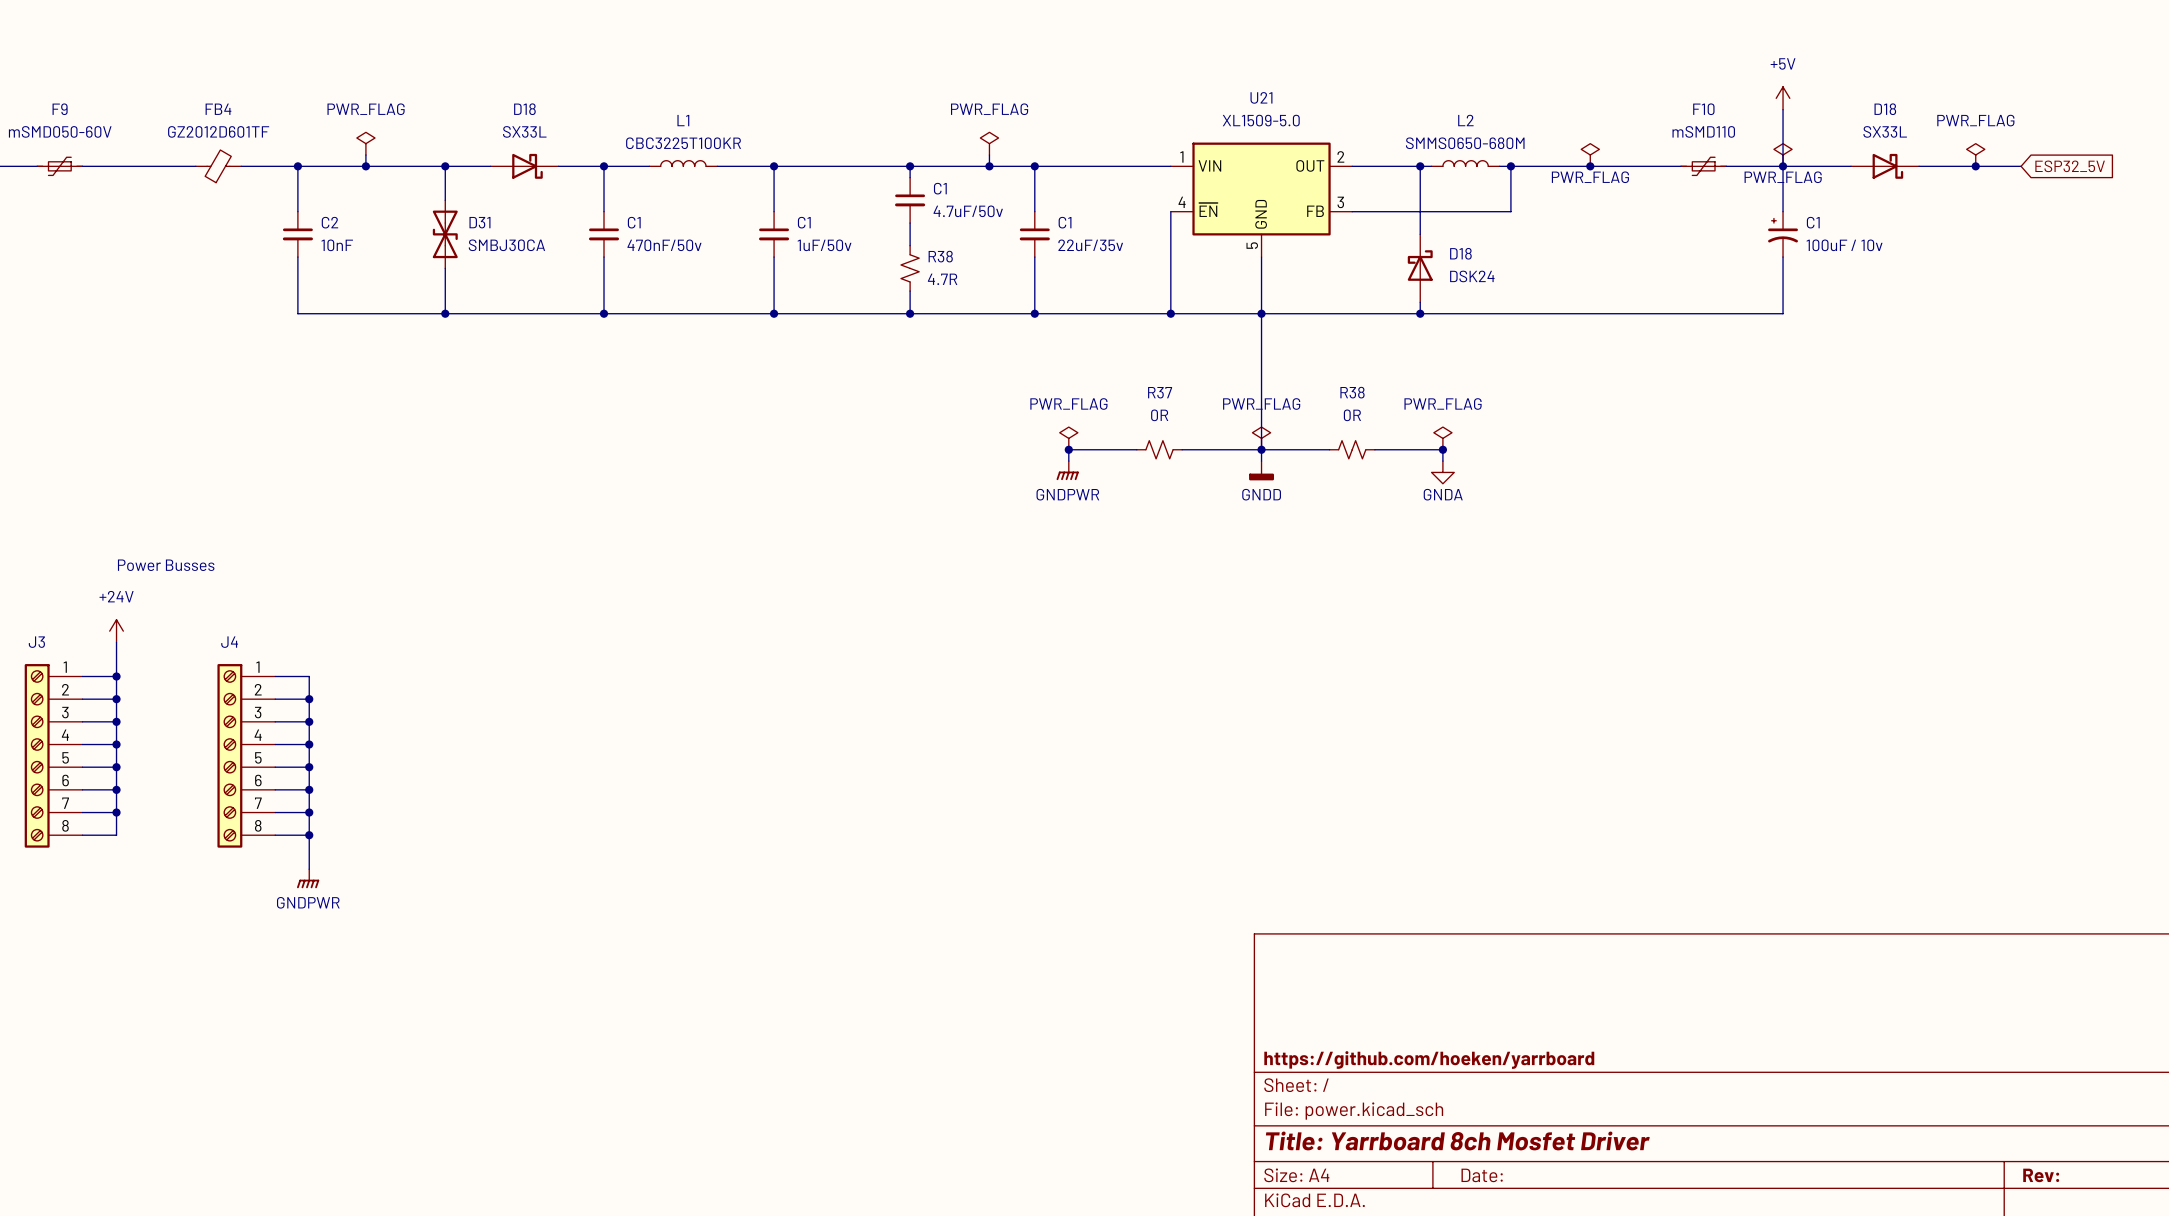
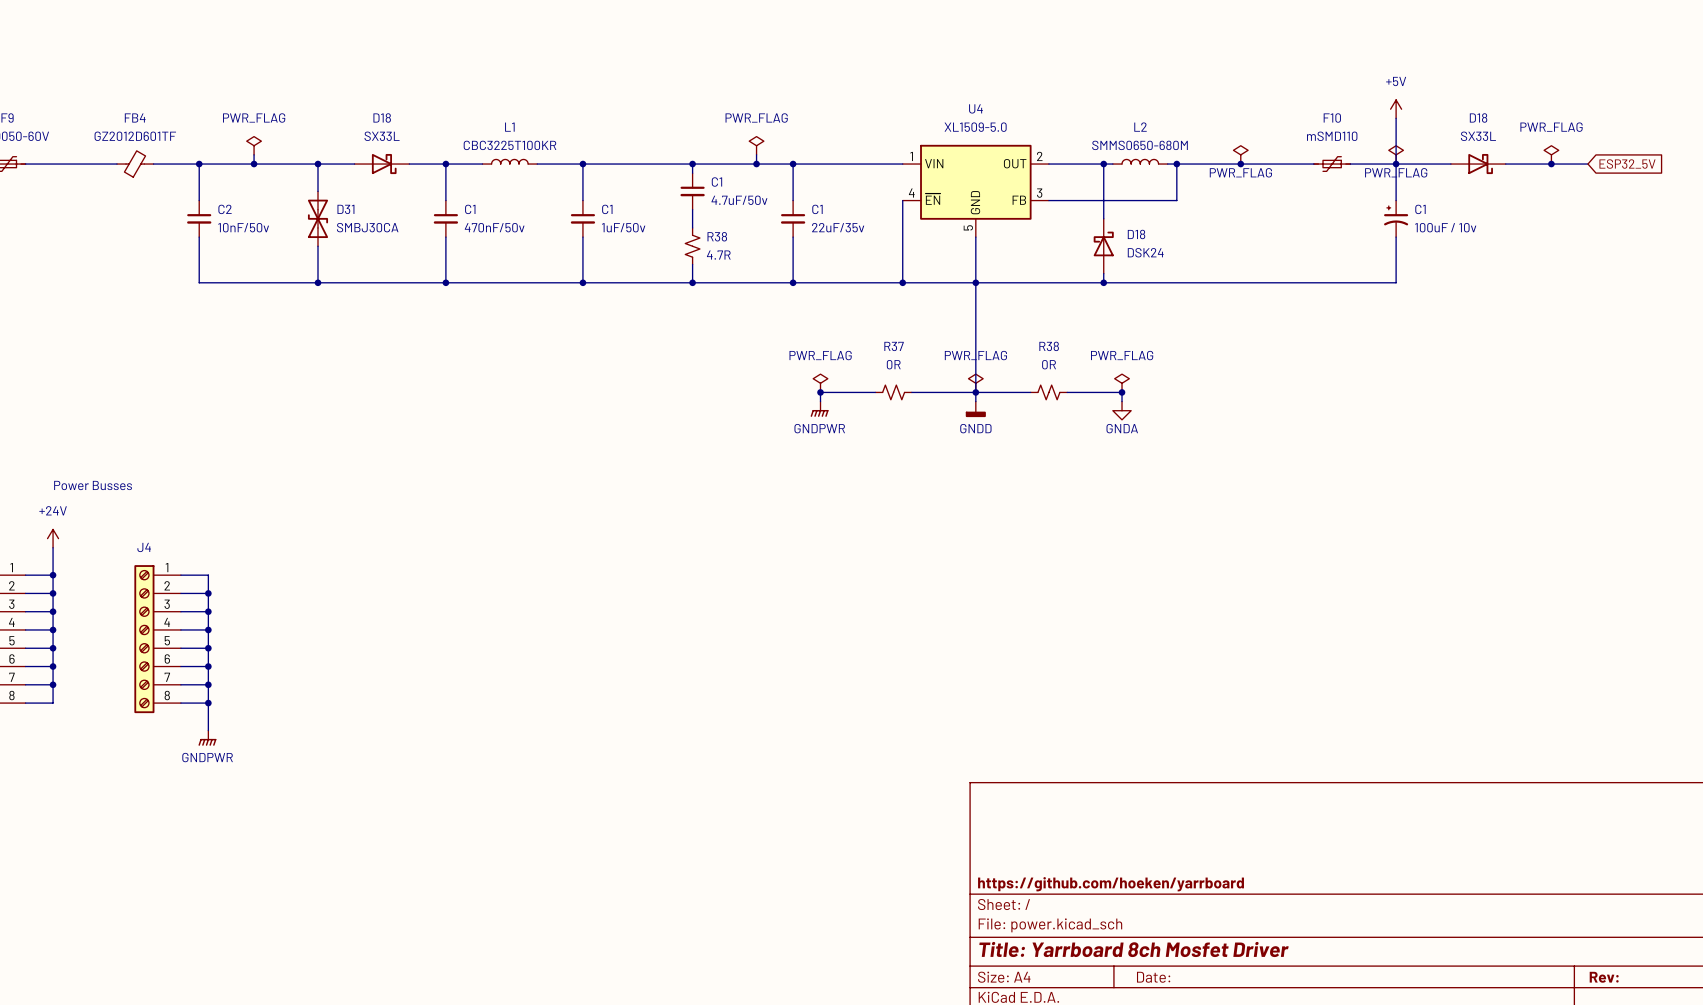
U21 name: U21 (1261, 97) -> U4 (975, 108)
C2 value: 10nF (337, 245) -> 10nF/50v (243, 227)

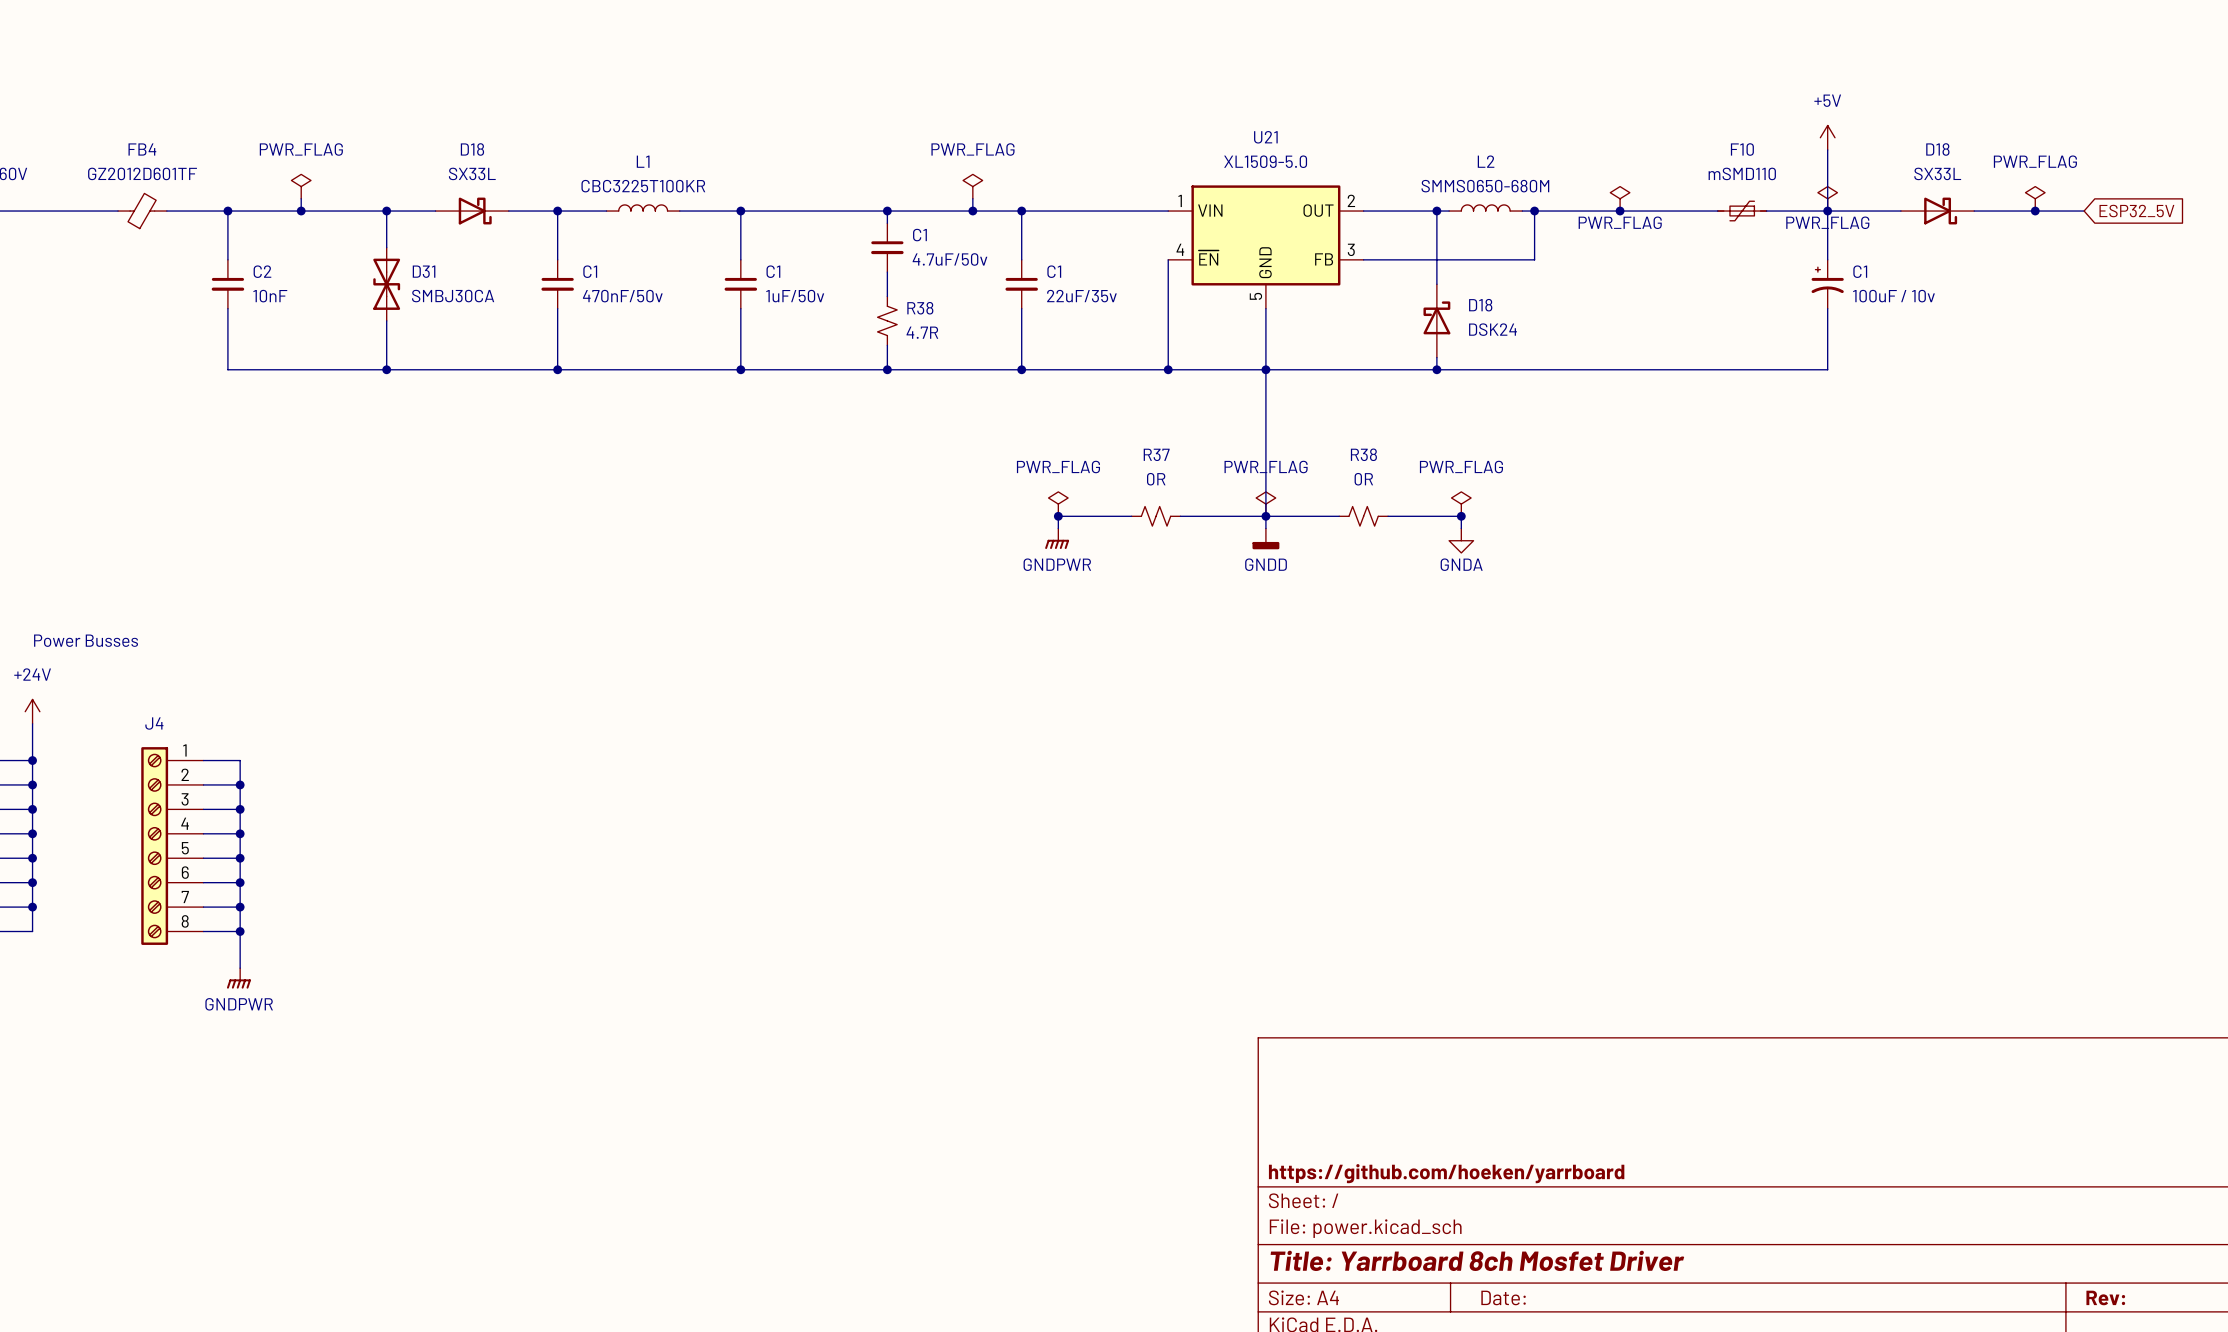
U4 name: U4 (975, 108) -> U21 (1265, 137)
C2 value: 10nF/50v (243, 227) -> 10nF (270, 296)

